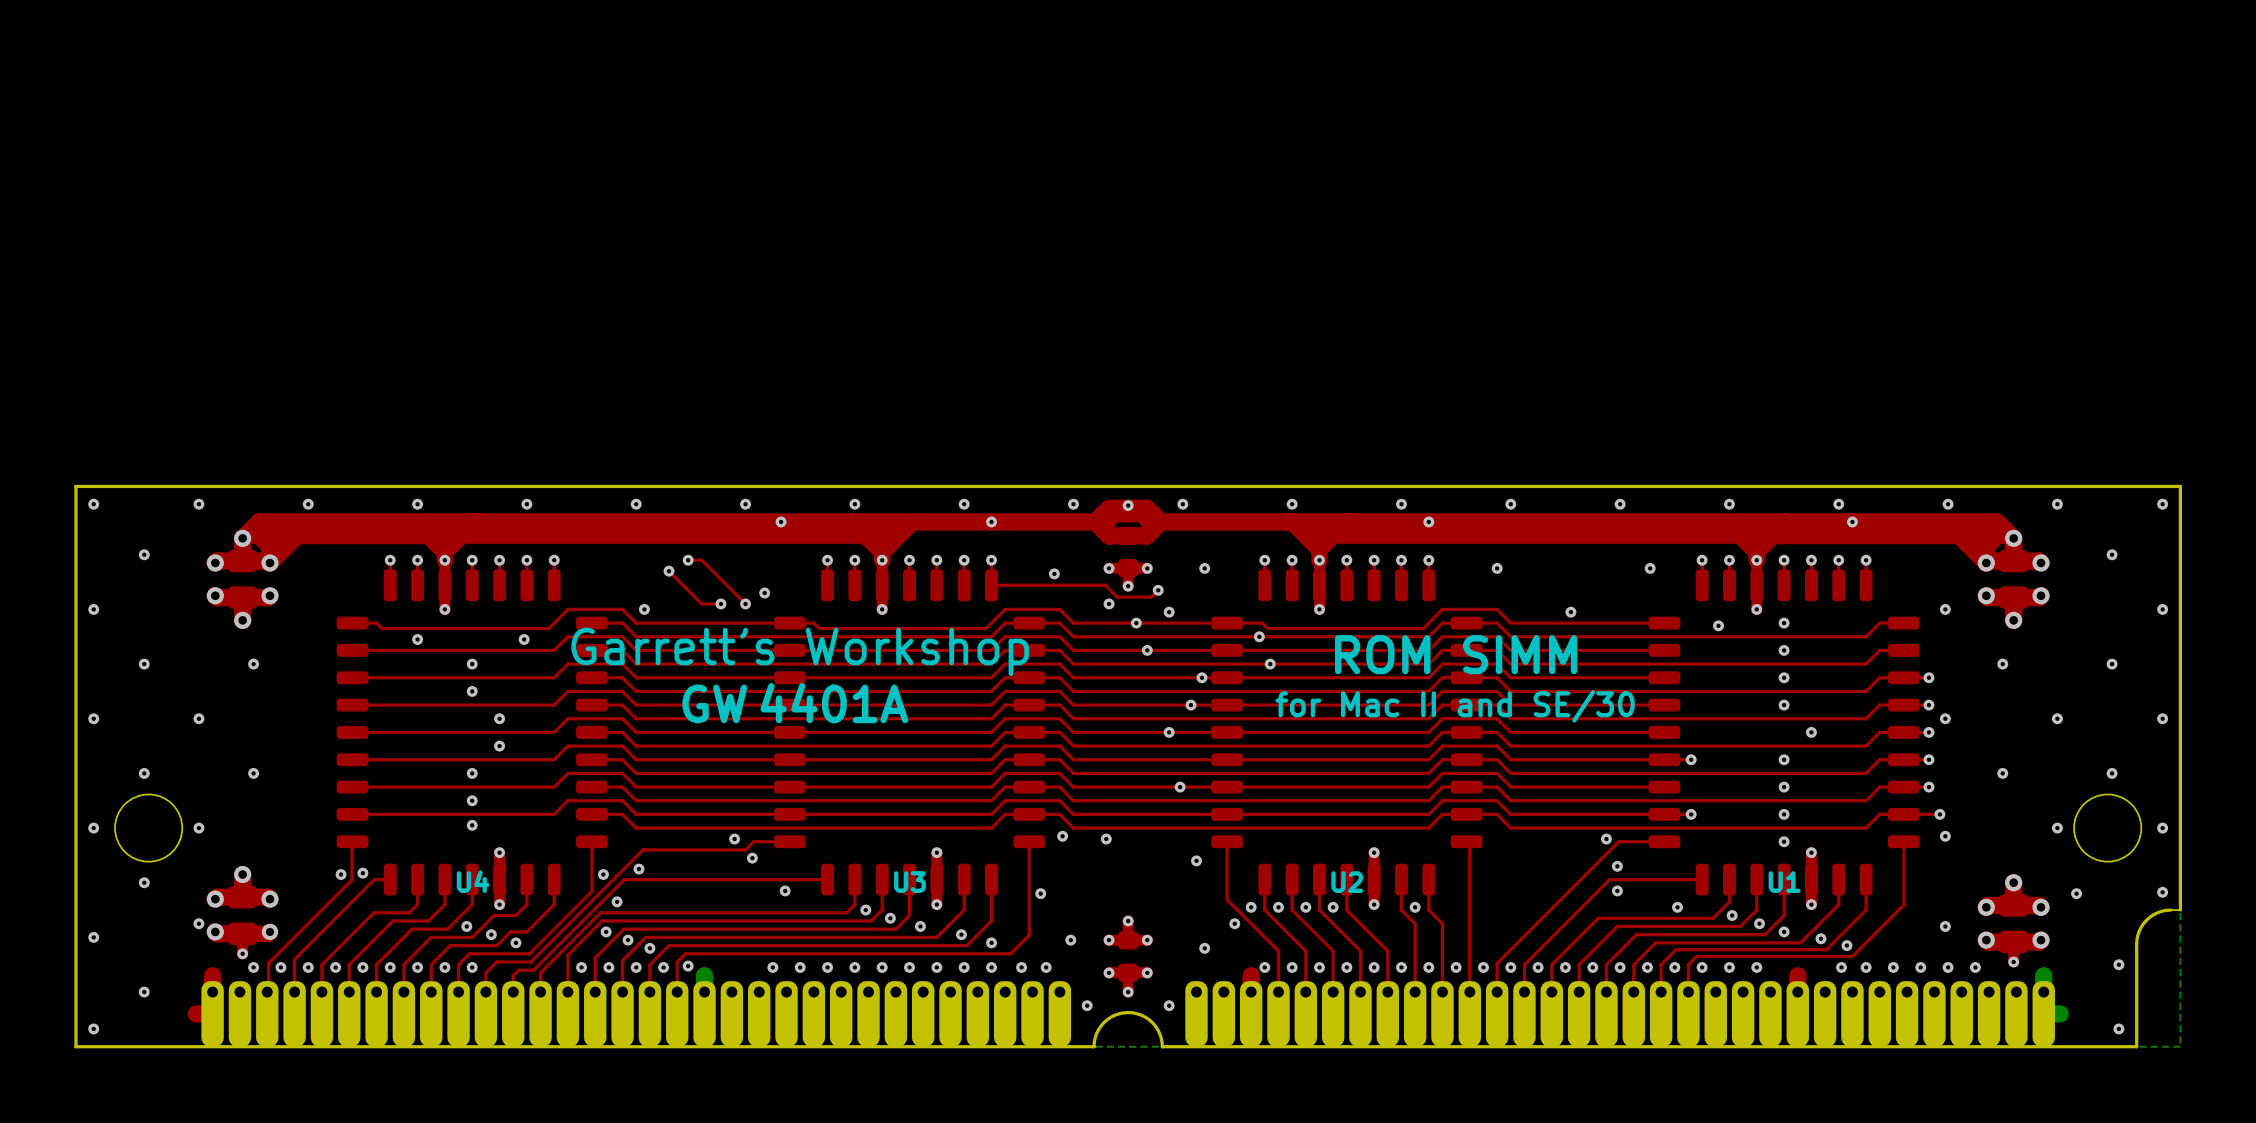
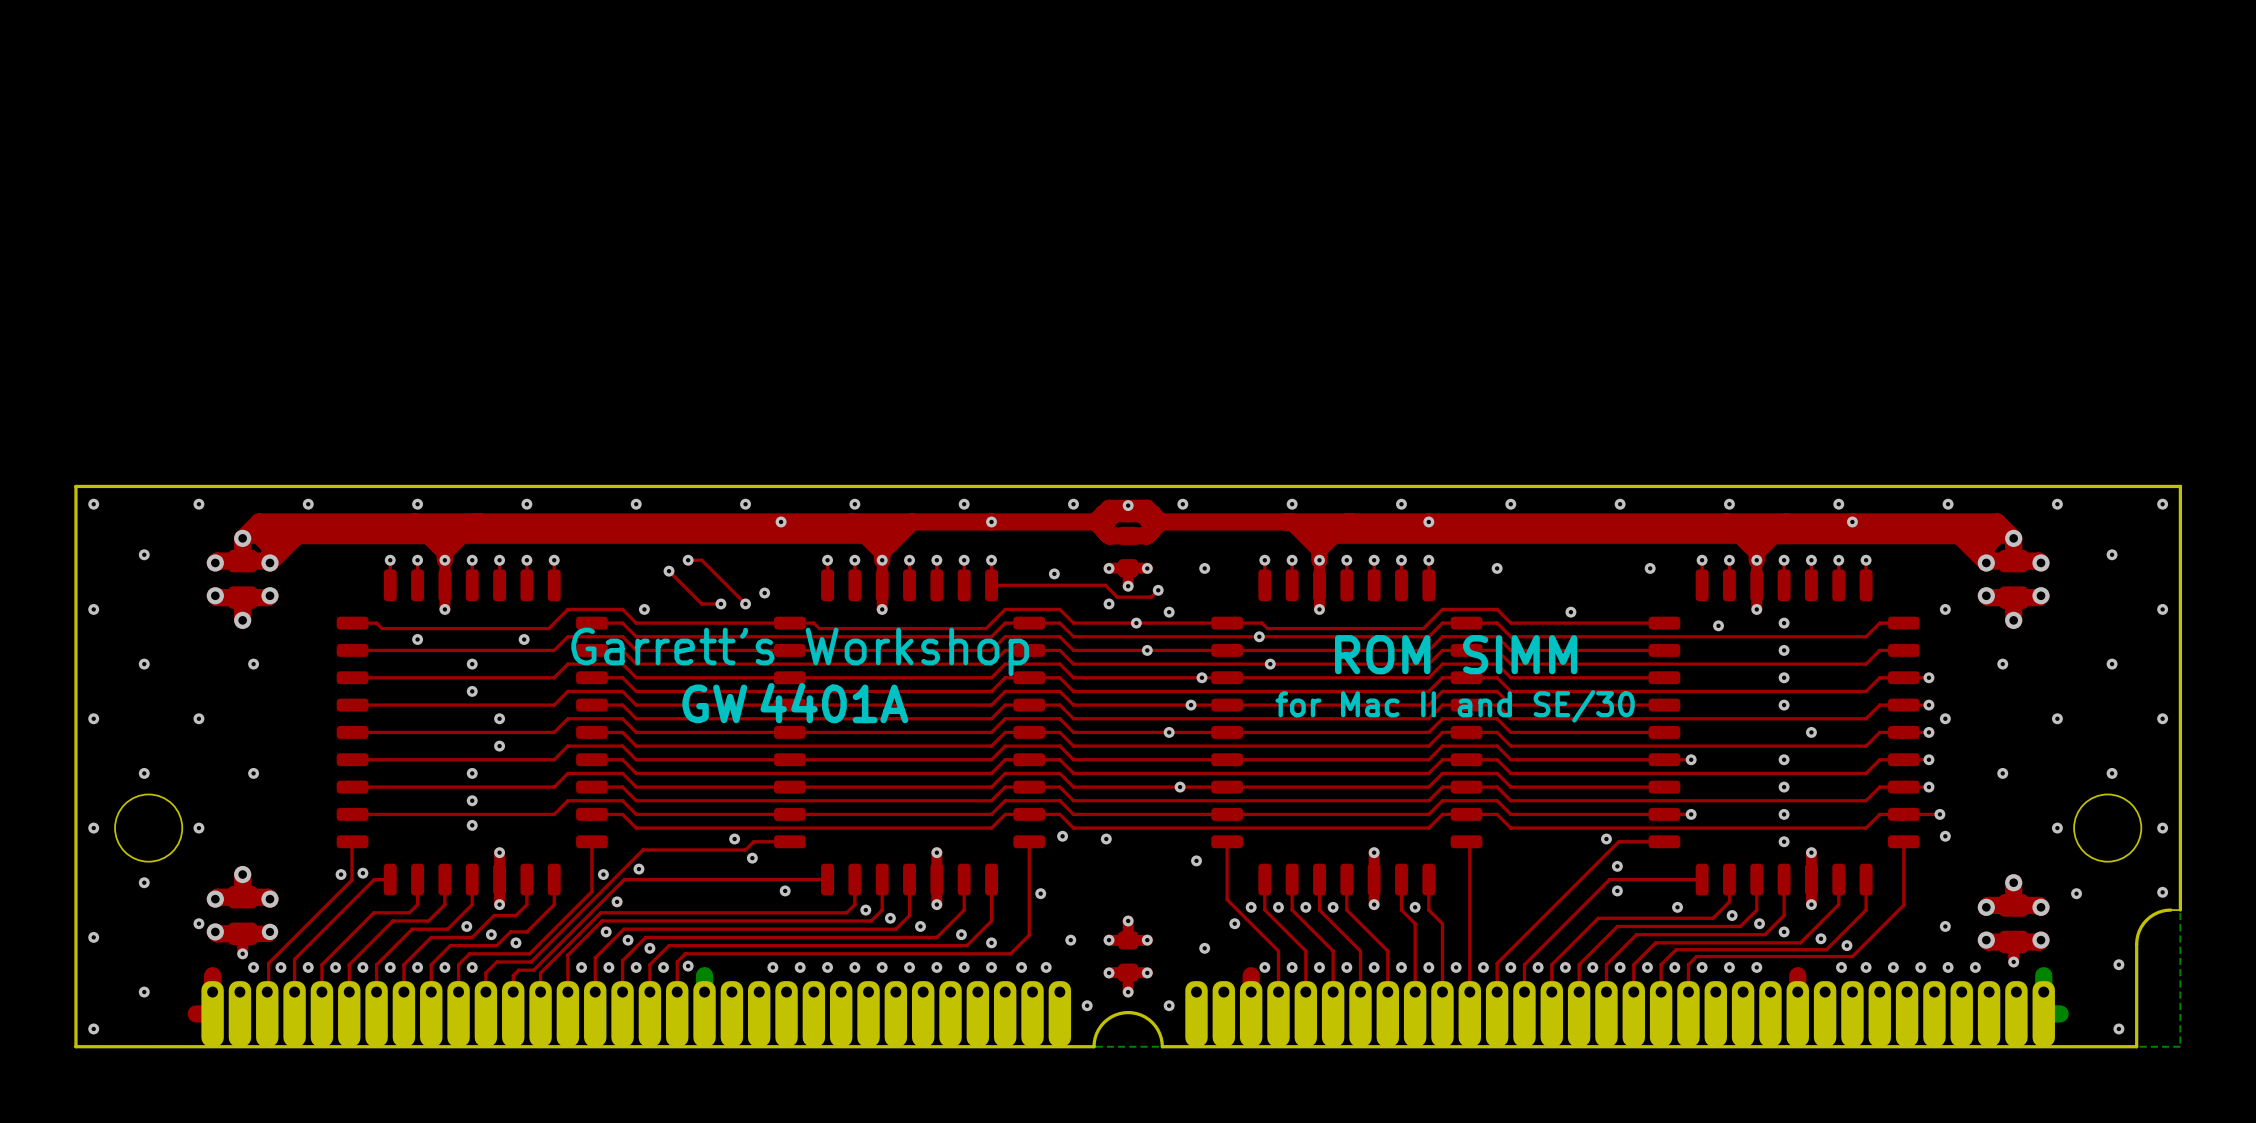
text: U4 (473, 881) -> none
text: U3 (909, 882) -> none
text: U2 (1347, 882) -> none
text: U1 (1784, 882) -> none

